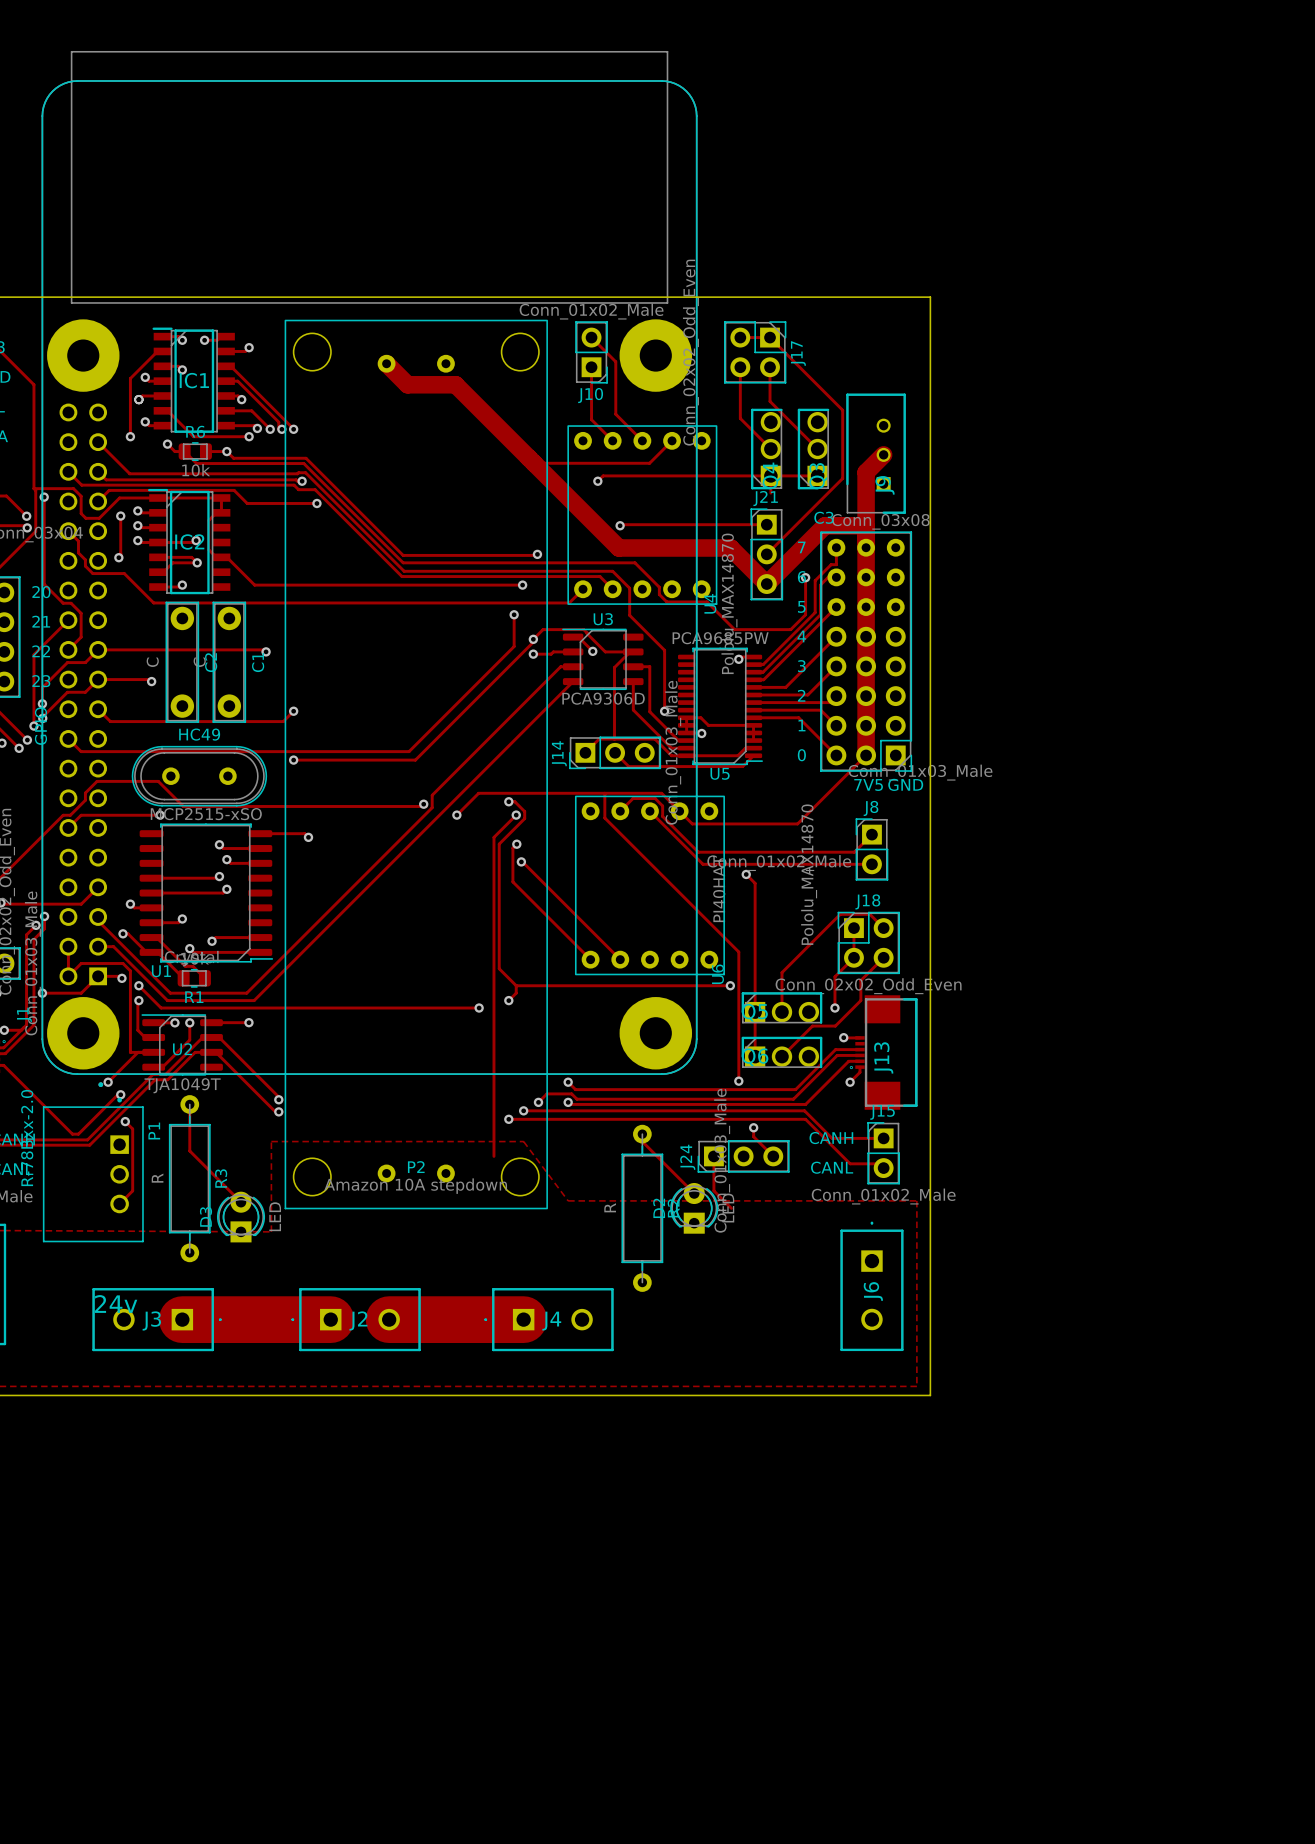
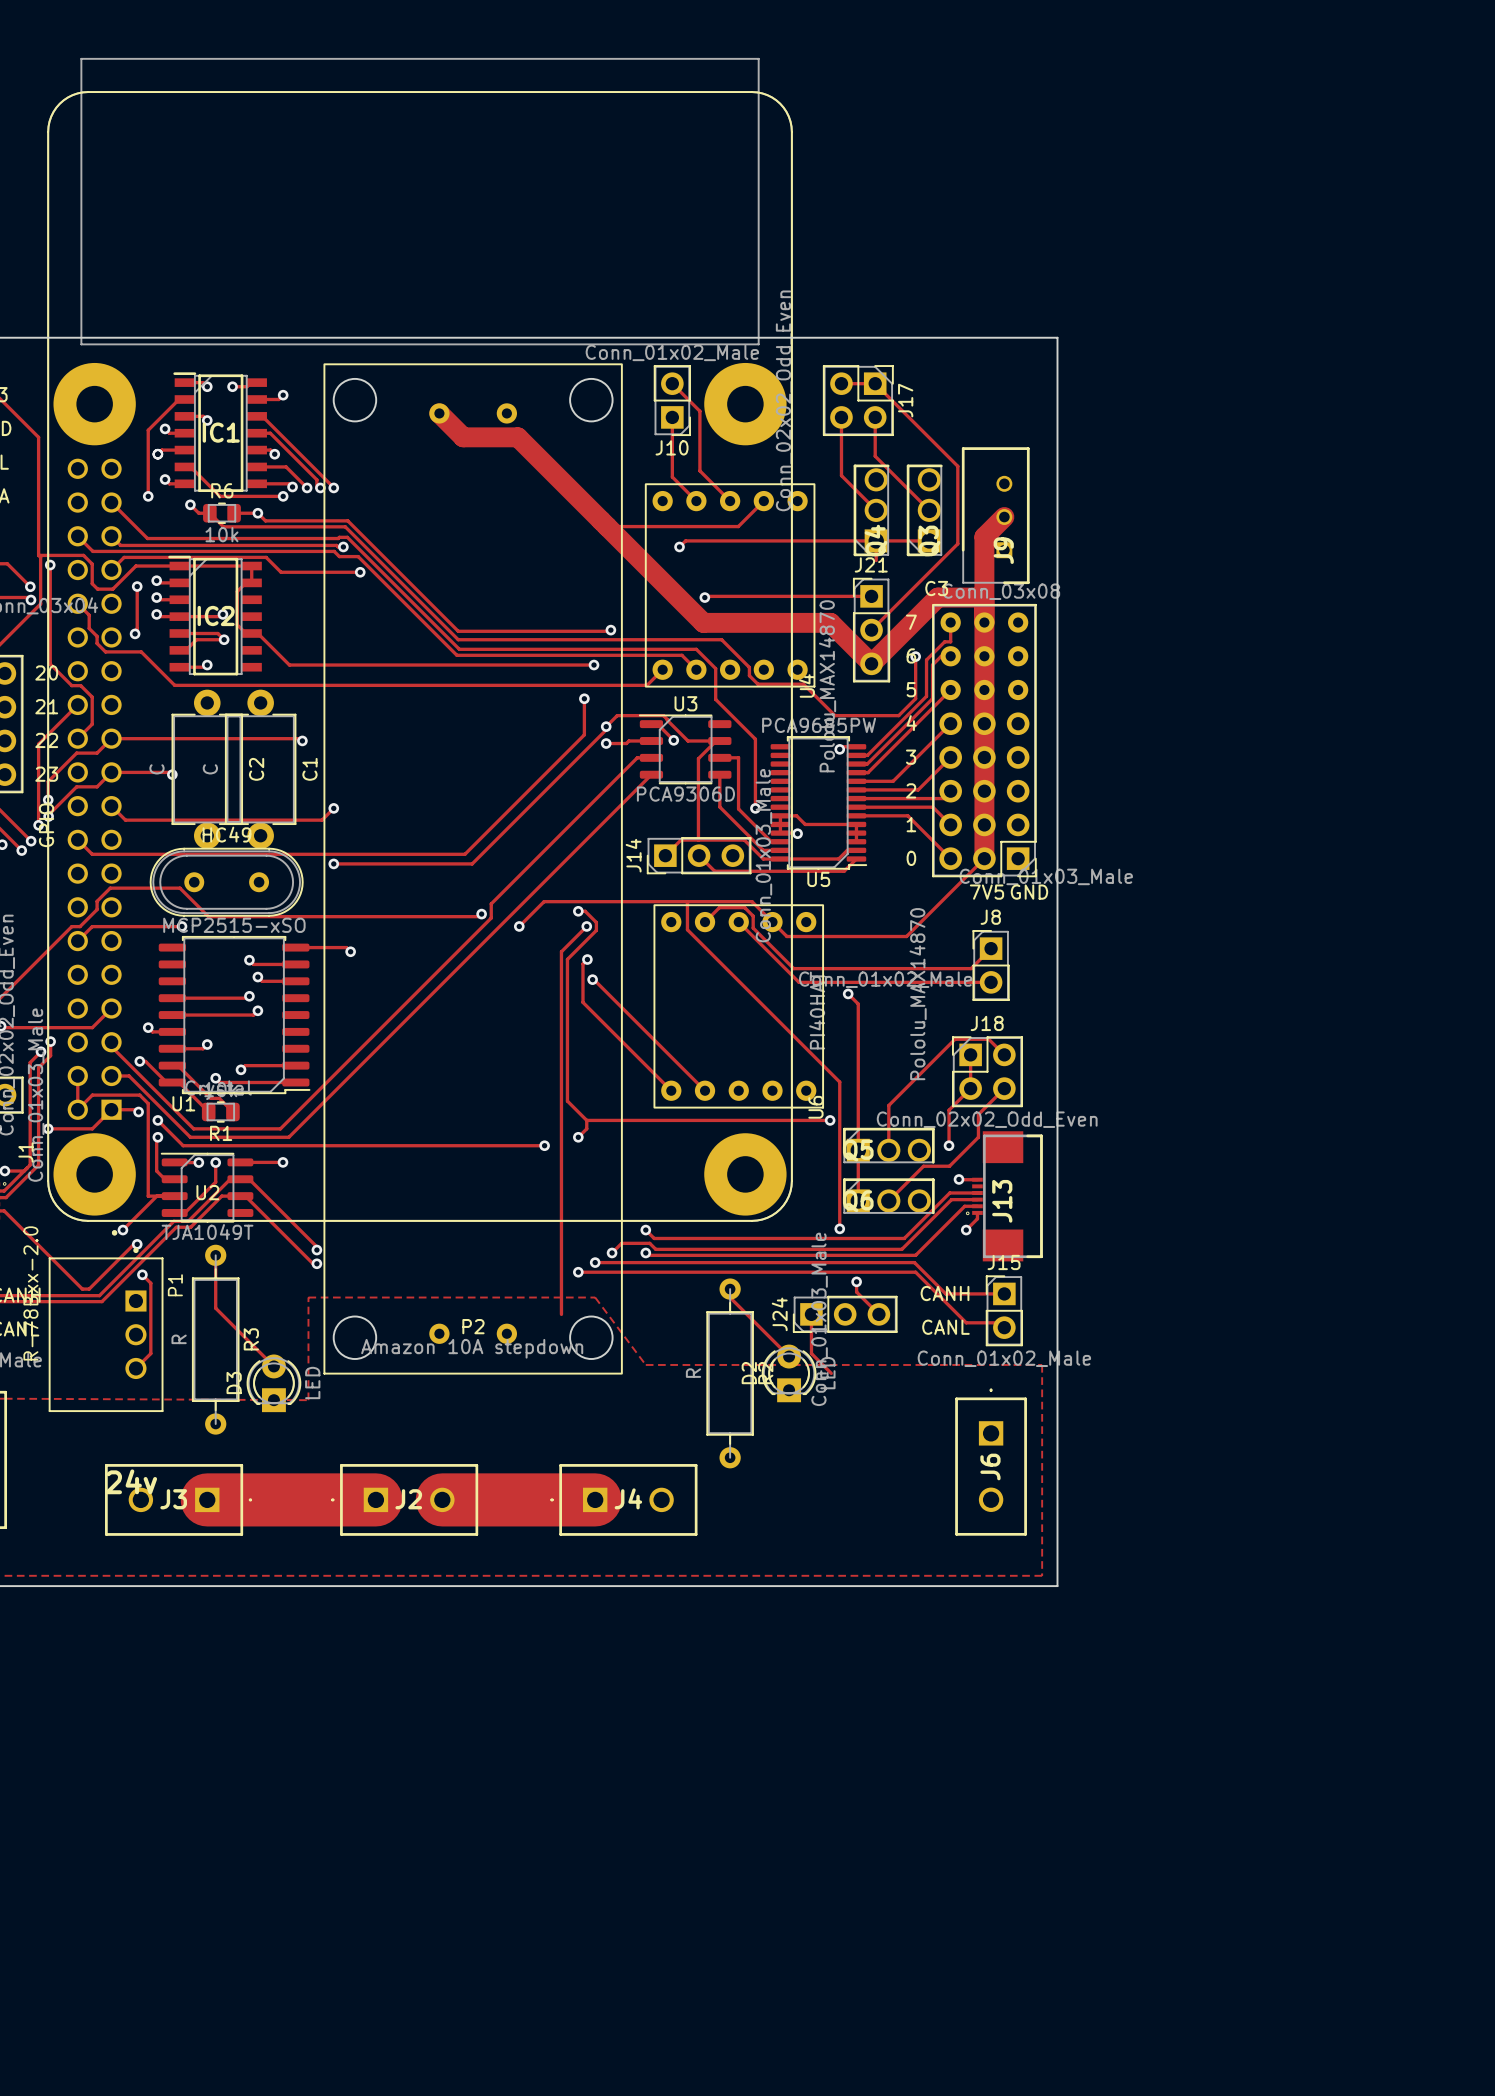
C2 footprint: [165, 601, 200, 723] -> [171, 689, 243, 850]
C1 footprint: [212, 601, 247, 723] -> [225, 689, 297, 850]

